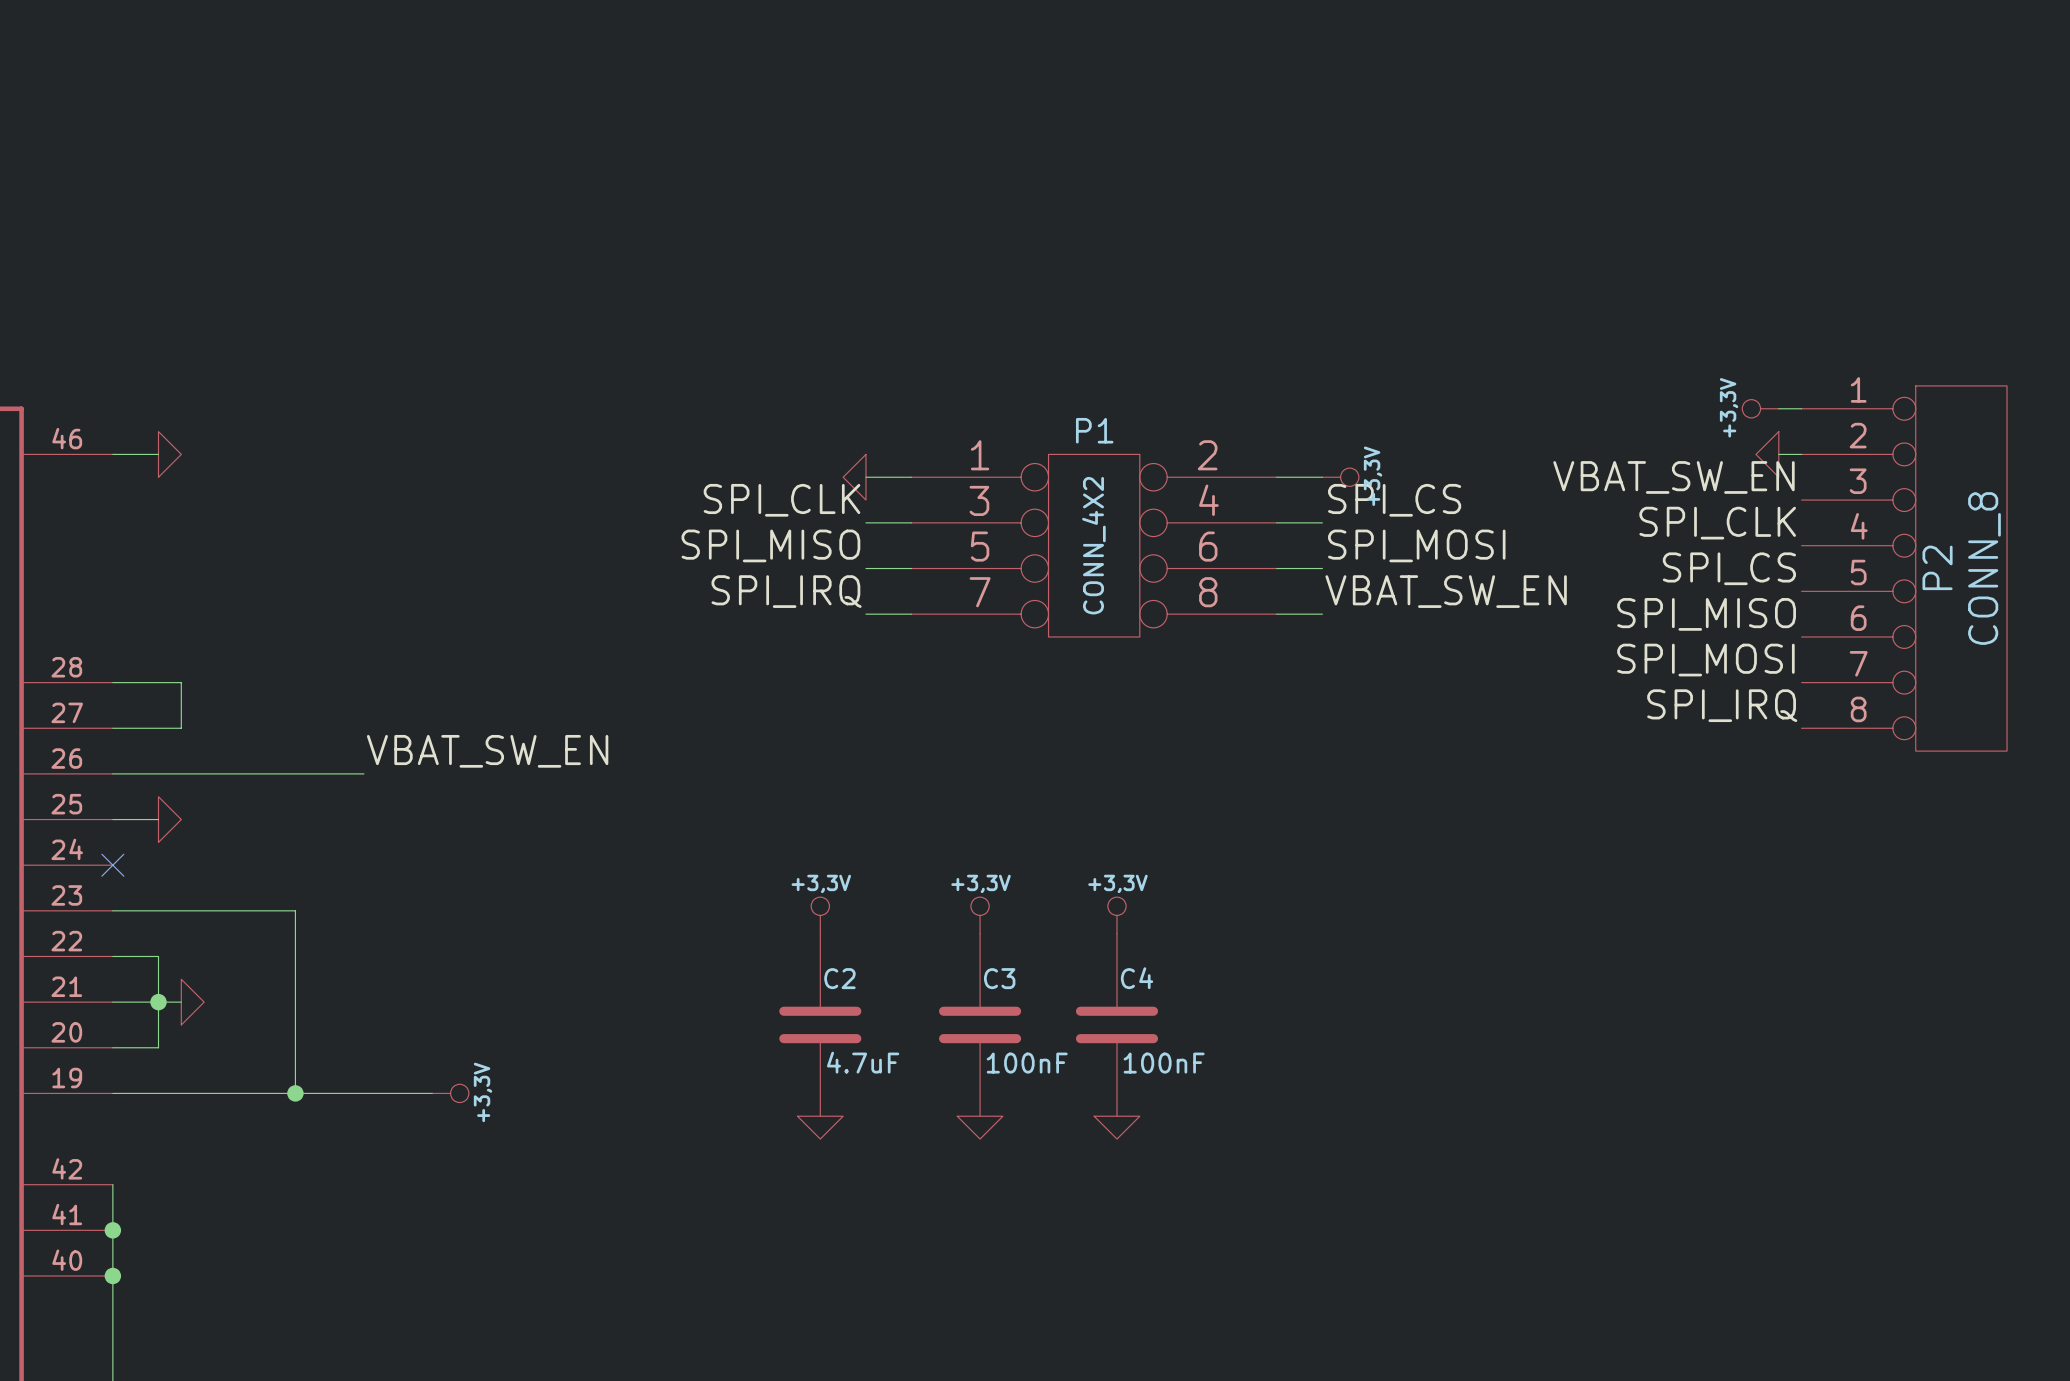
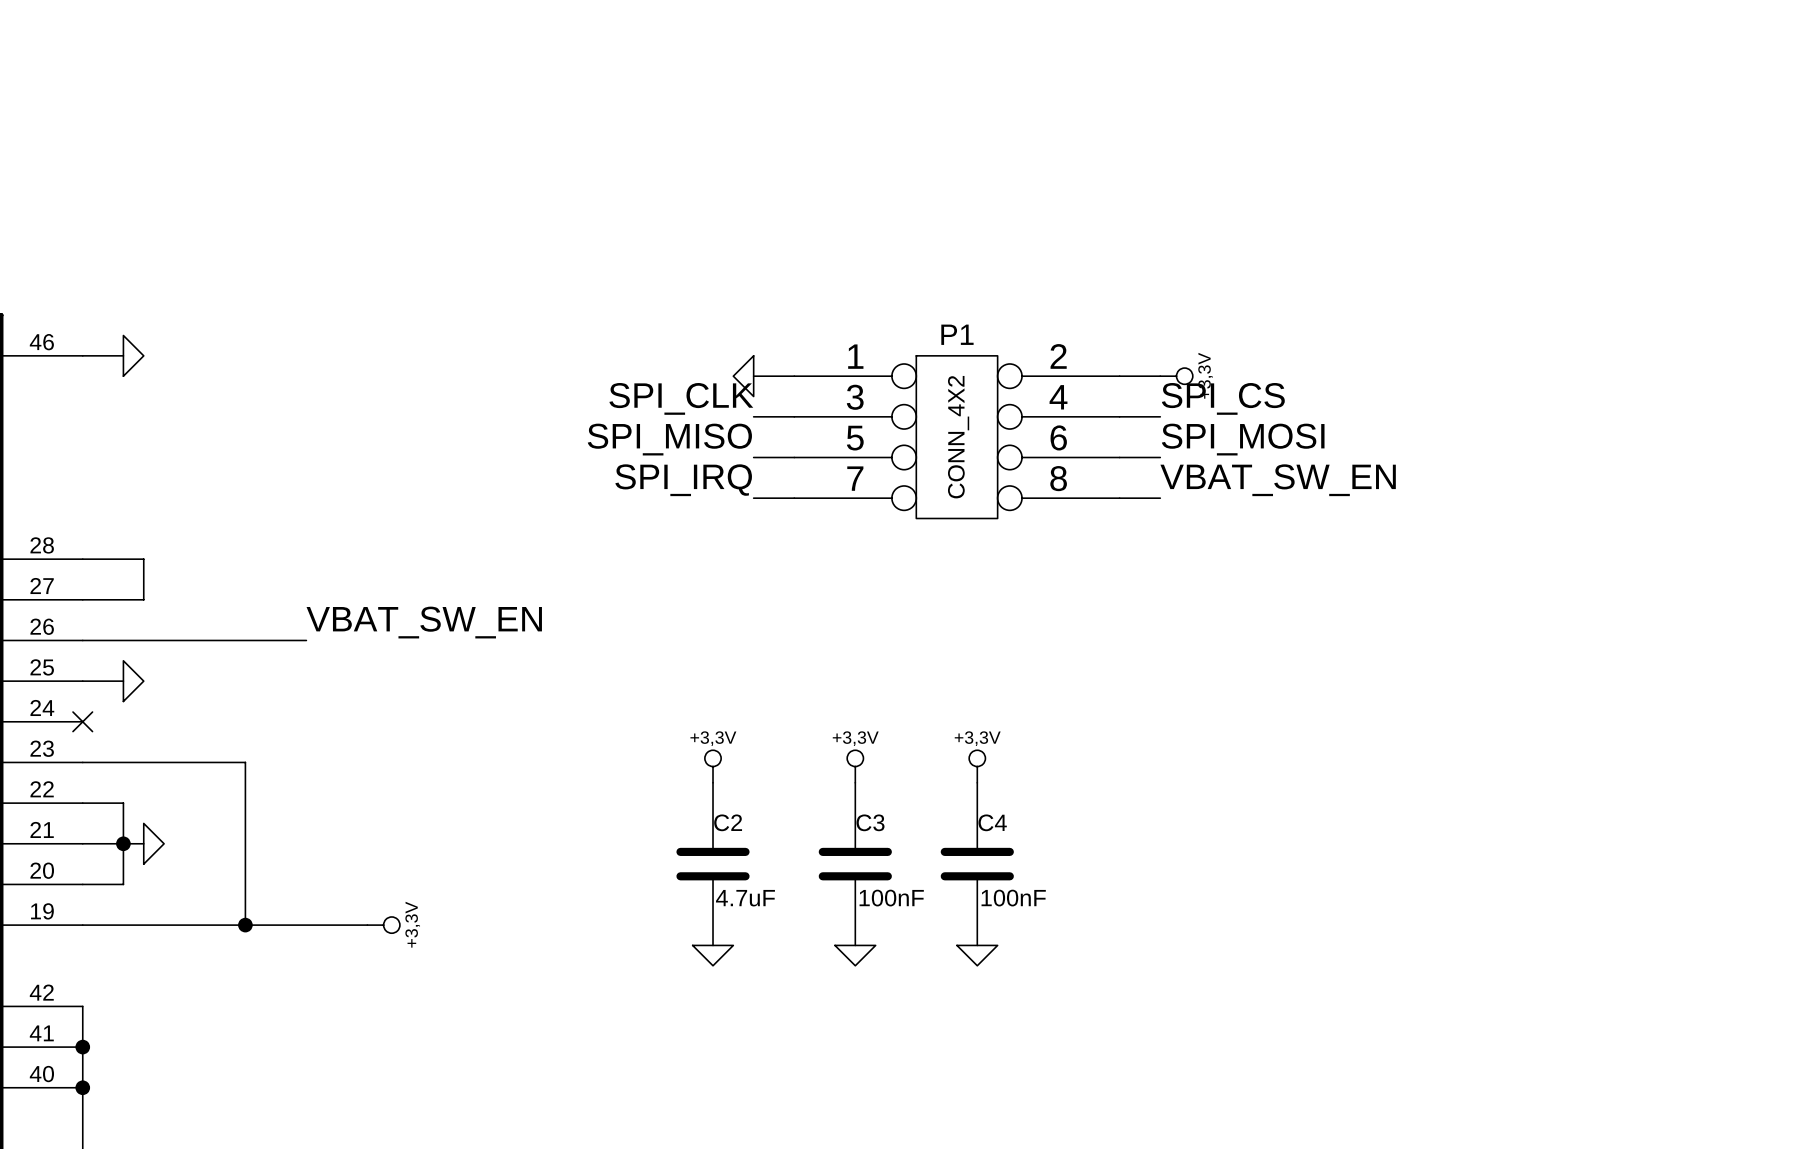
power symbol: +3,3V (1760, 408) -> none
wire: (1778, 408) (1801, 408) -> none
power symbol: (1767, 454) -> none
wire: (1778, 454) (1801, 454) -> none
label: VBAT_SW_EN (1673, 477) -> none
label: SPI_CLK (1717, 523) -> none
label: SPI_CS (1729, 568) -> none
P2: CONN_8 (1904, 568) -> none
label: SPI_MISO (1706, 614) -> none
label: SPI_MOSI (1705, 660) -> none
label: SPI_IRQ (1722, 705) -> none

